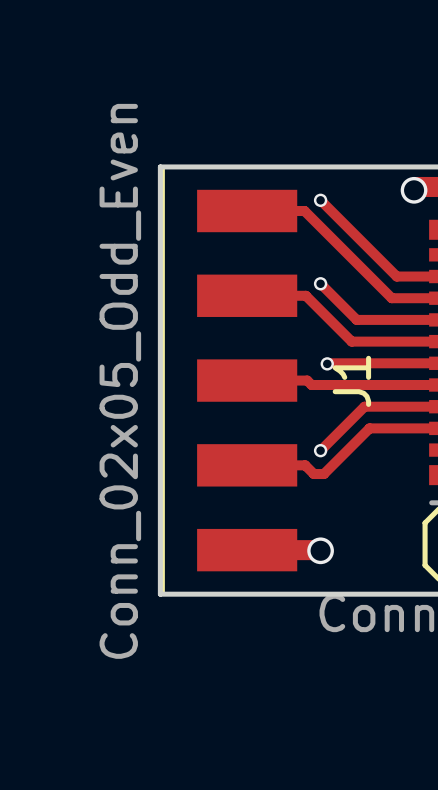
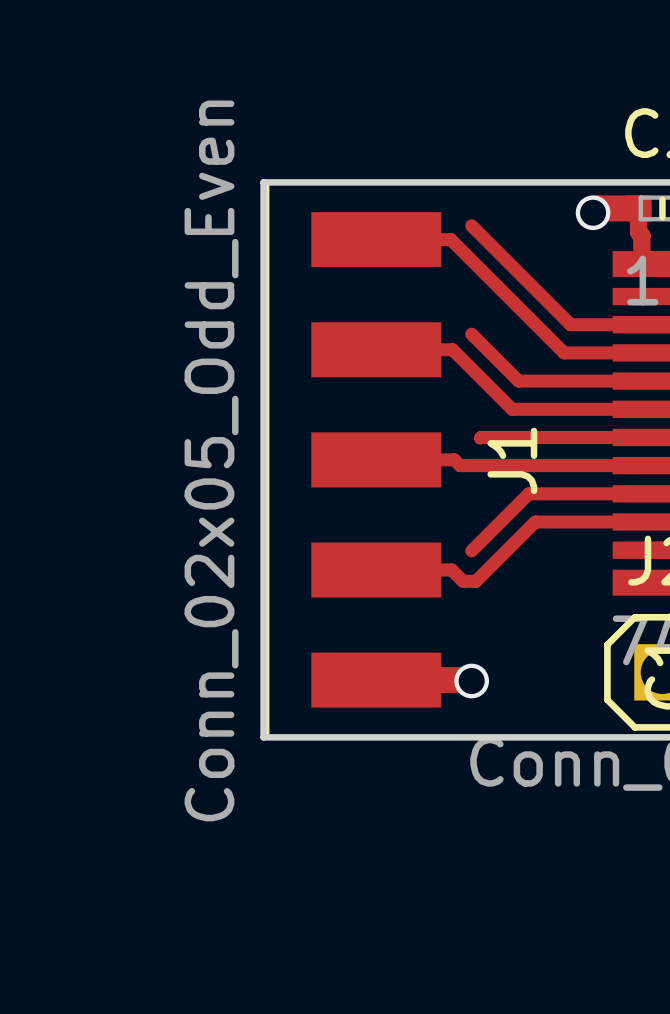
via: (320, 200) -> none
via: (320, 283) -> none
via: (327, 363) -> none
via: (320, 450) -> none

